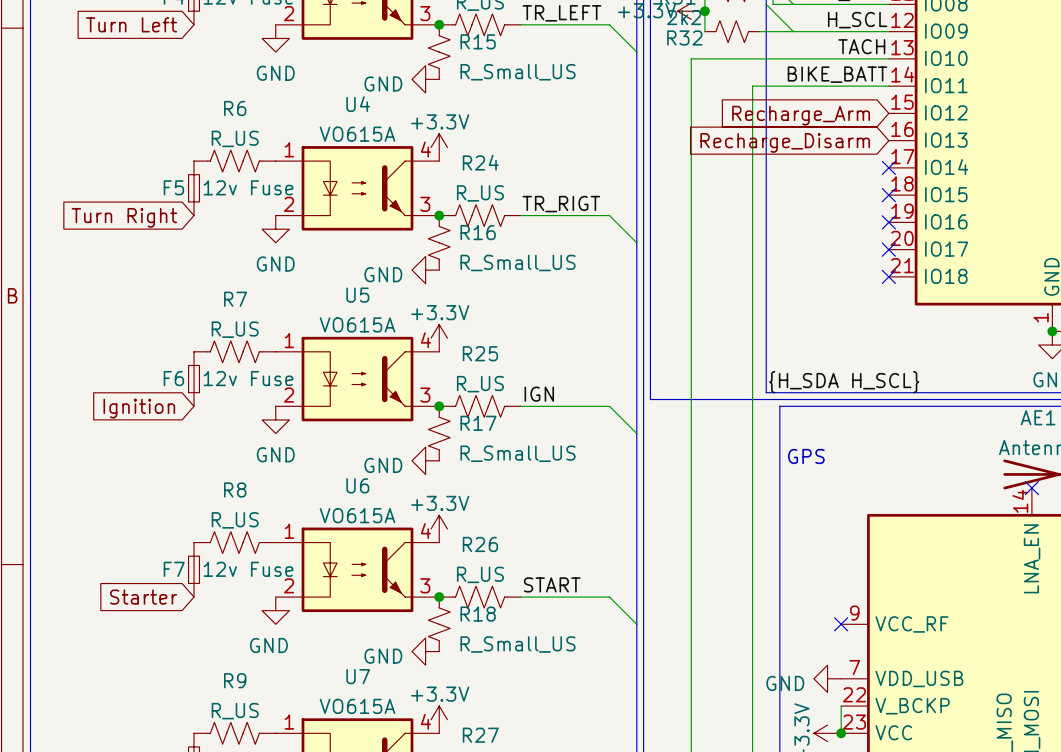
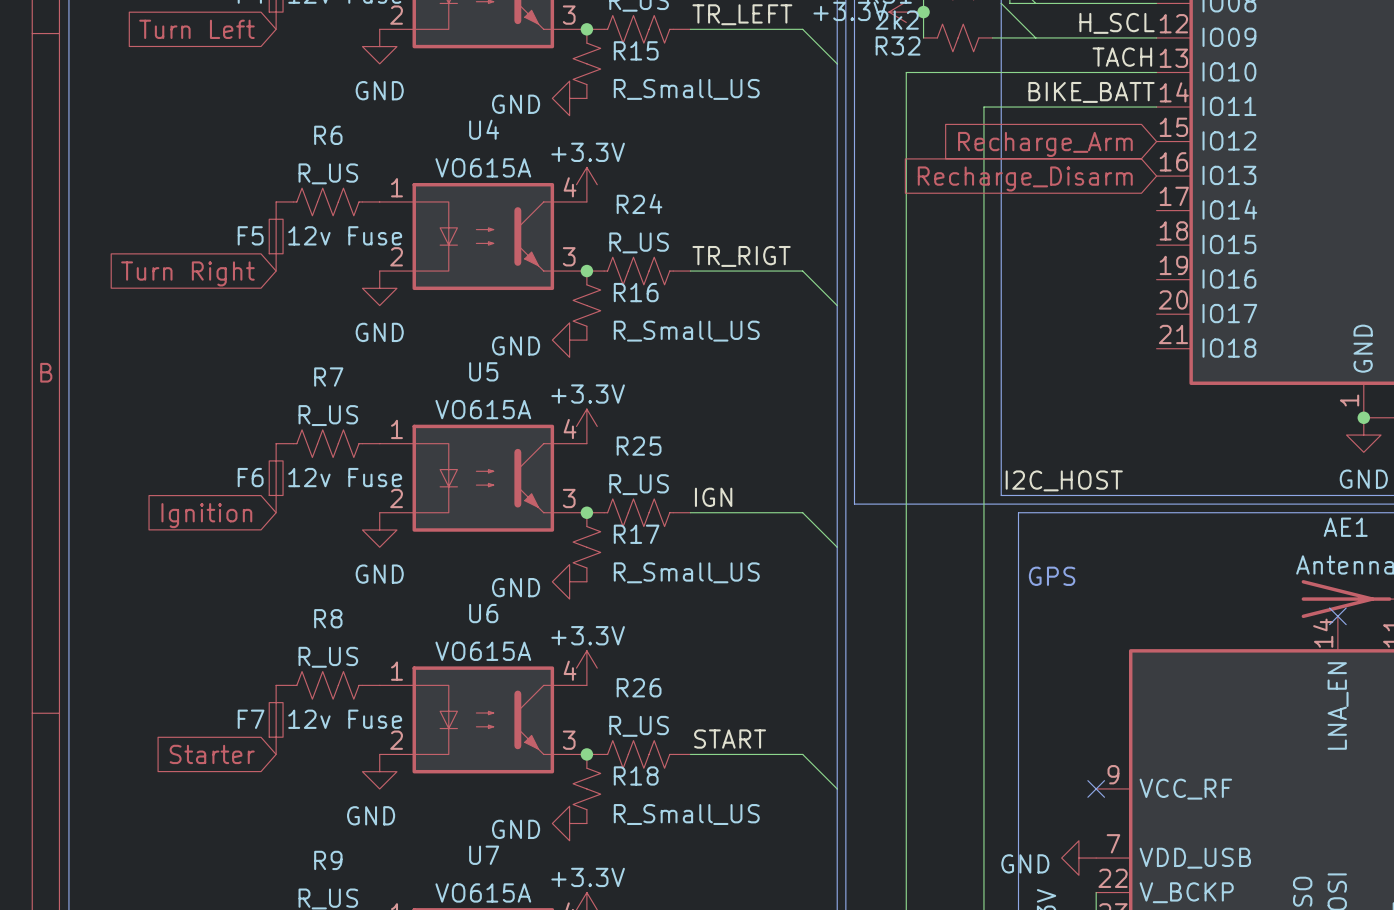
no-connect mark: (888, 167) -> none
no-connect mark: (888, 195) -> none
no-connect mark: (888, 222) -> none
no-connect mark: (888, 249) -> none
no-connect mark: (888, 276) -> none
label: {H_SDA H_SCL} (844, 382) -> I2C_HOST (1064, 480)

